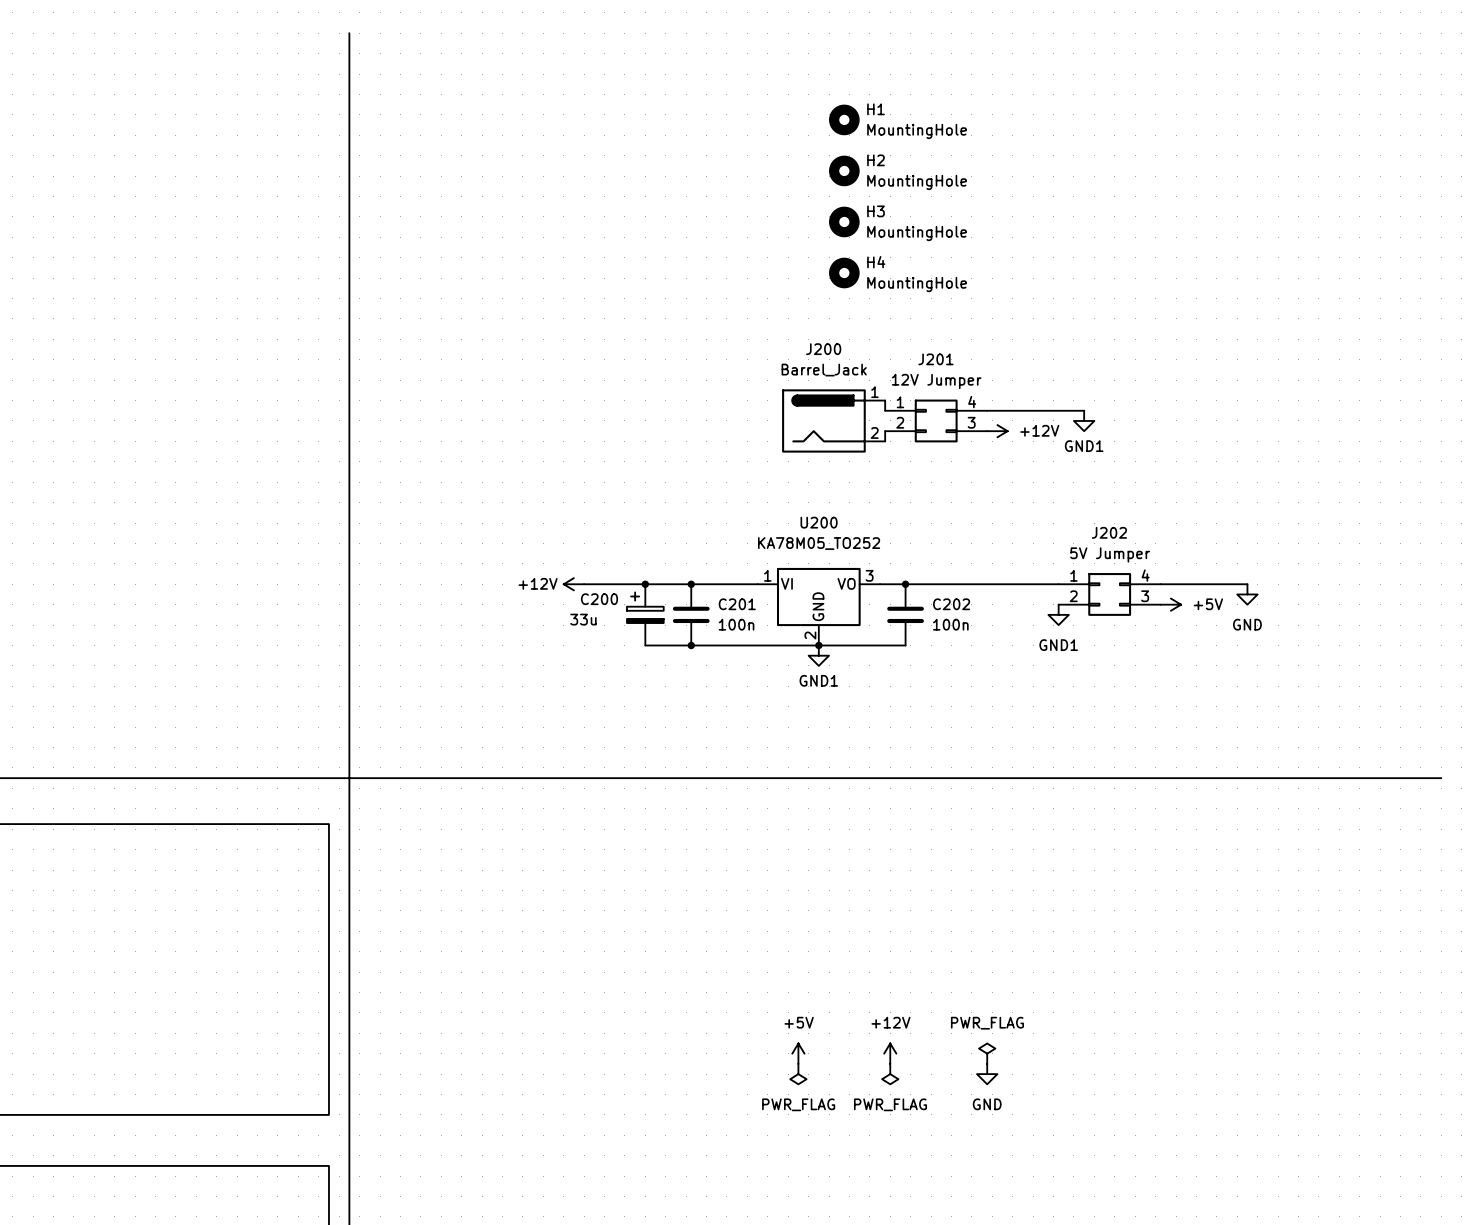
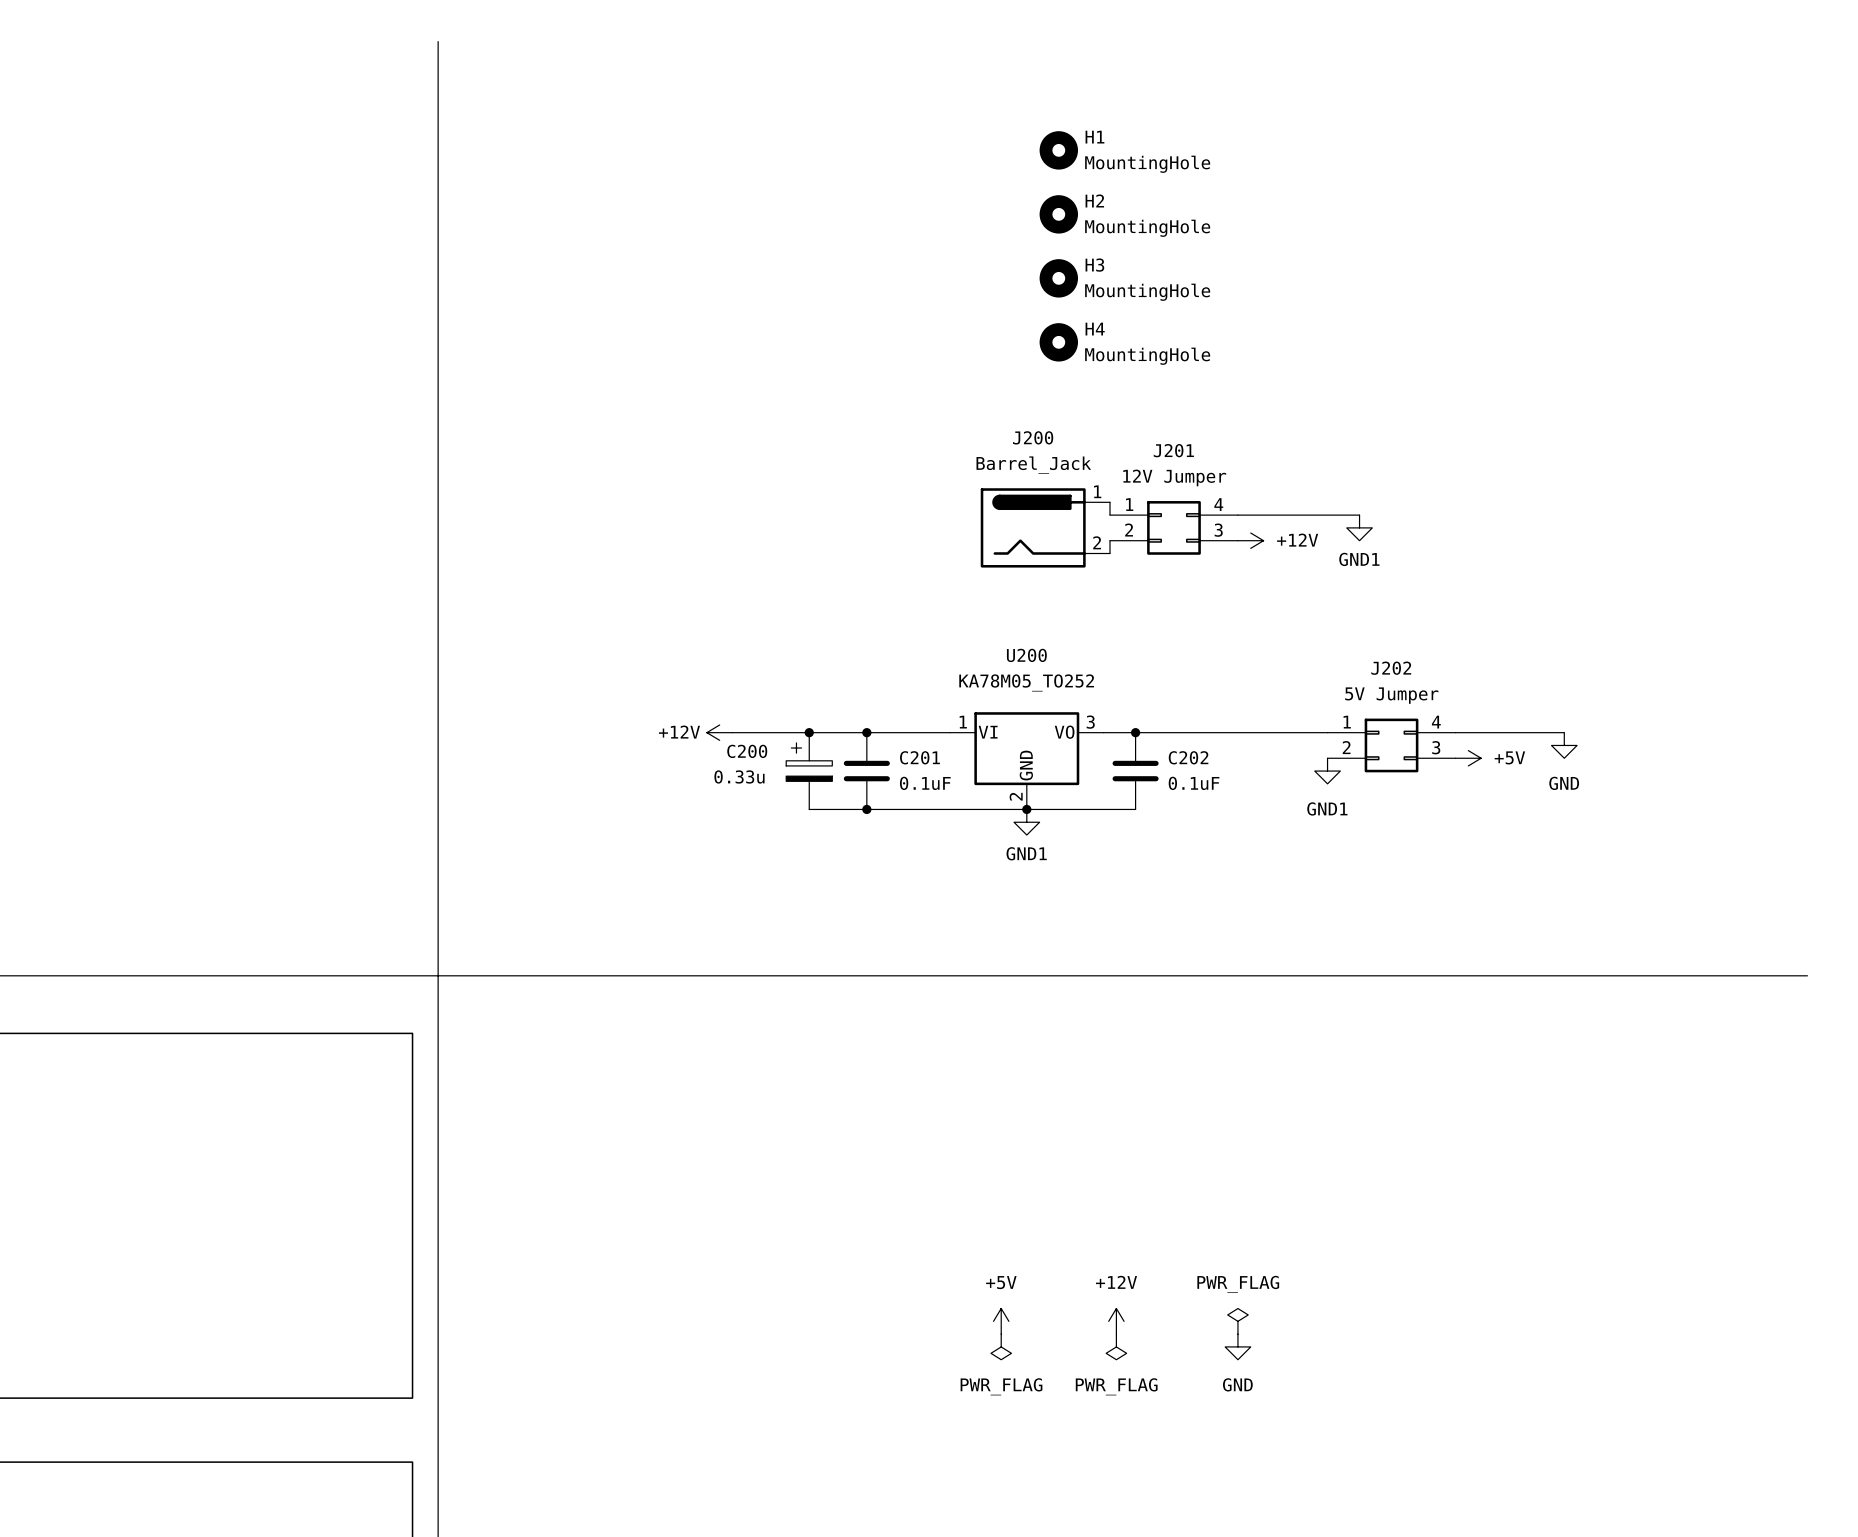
C200 value: 33u (583, 619) -> 0.33u (739, 776)
C201 value: 100n (736, 624) -> 0.1uF (925, 783)
C202 value: 100n (950, 624) -> 0.1uF (1194, 783)

